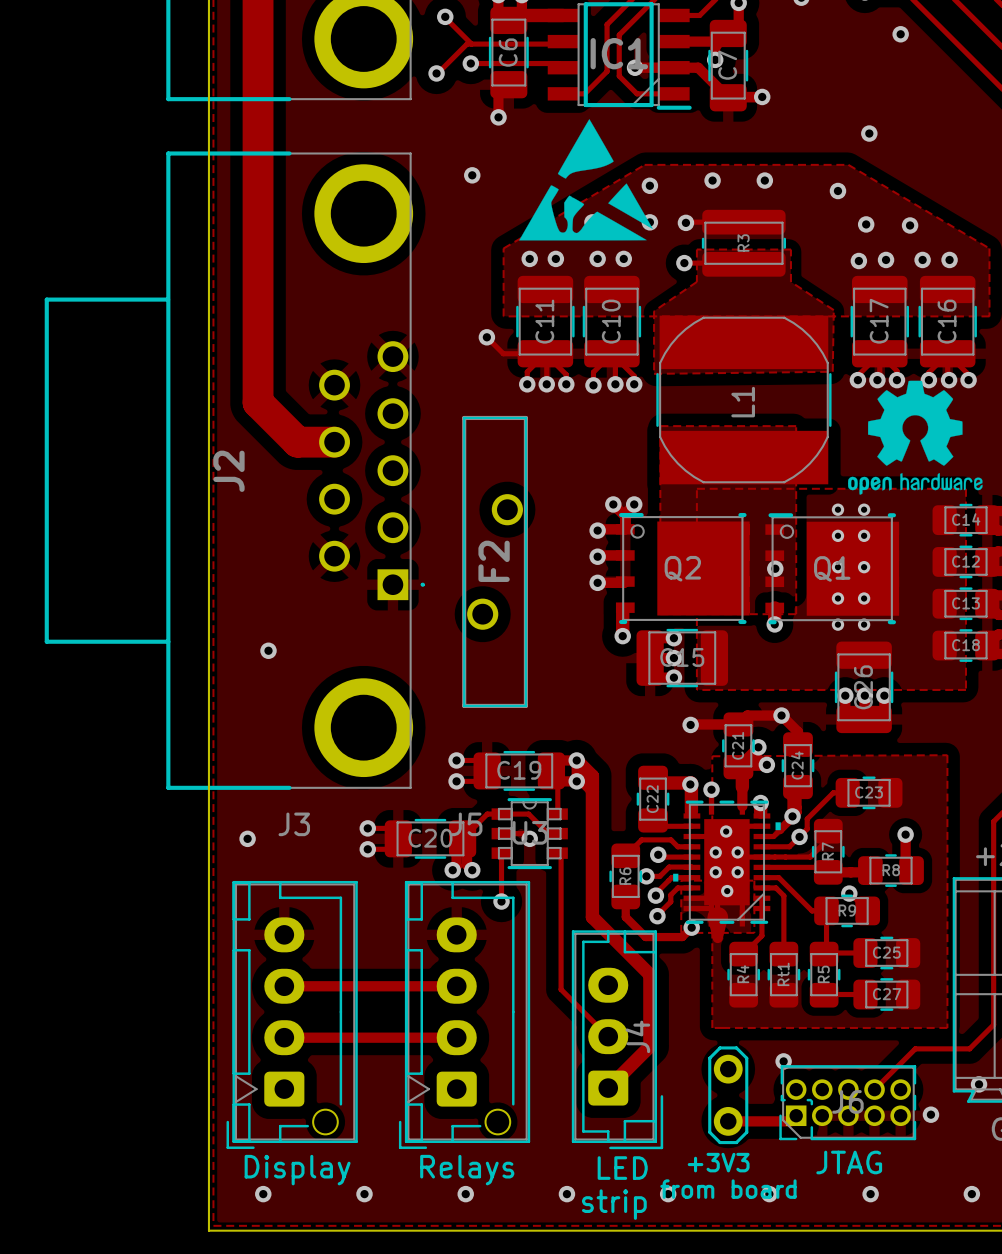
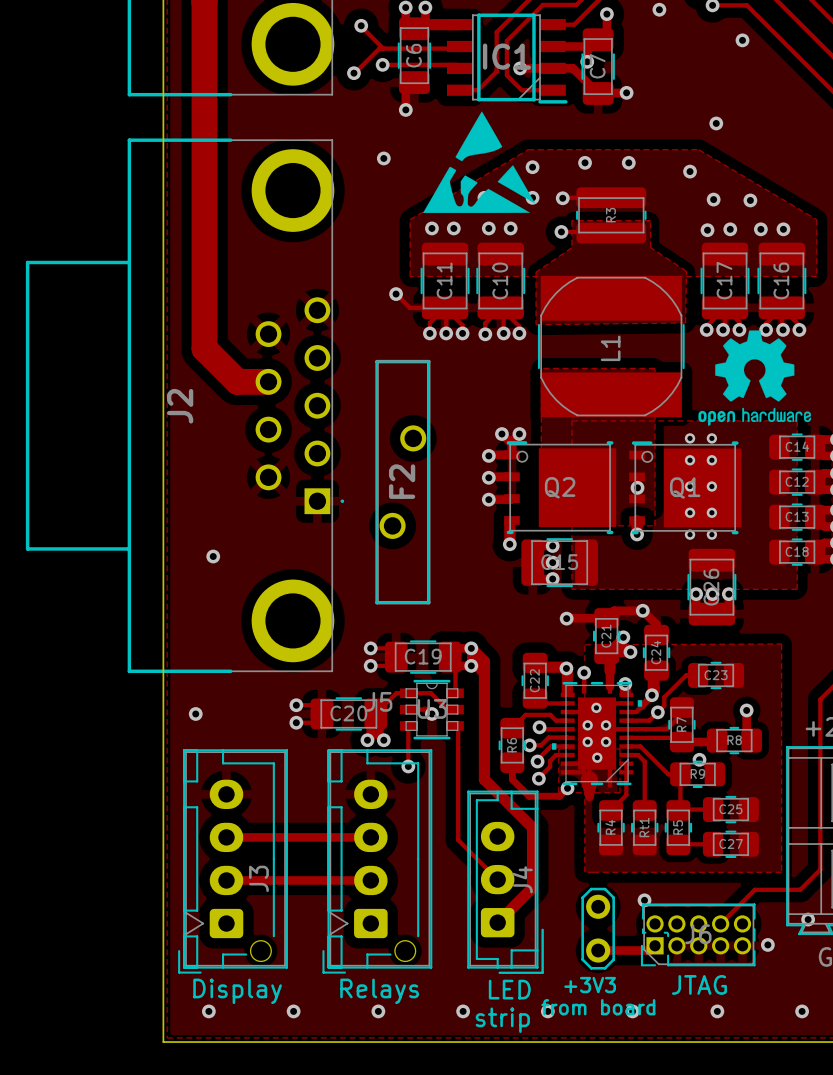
J3 name rotation: 0° (294, 824) -> 90° counterclockwise (258, 878)
J3 name position: J3 (294, 824) -> J3 (258, 878)

